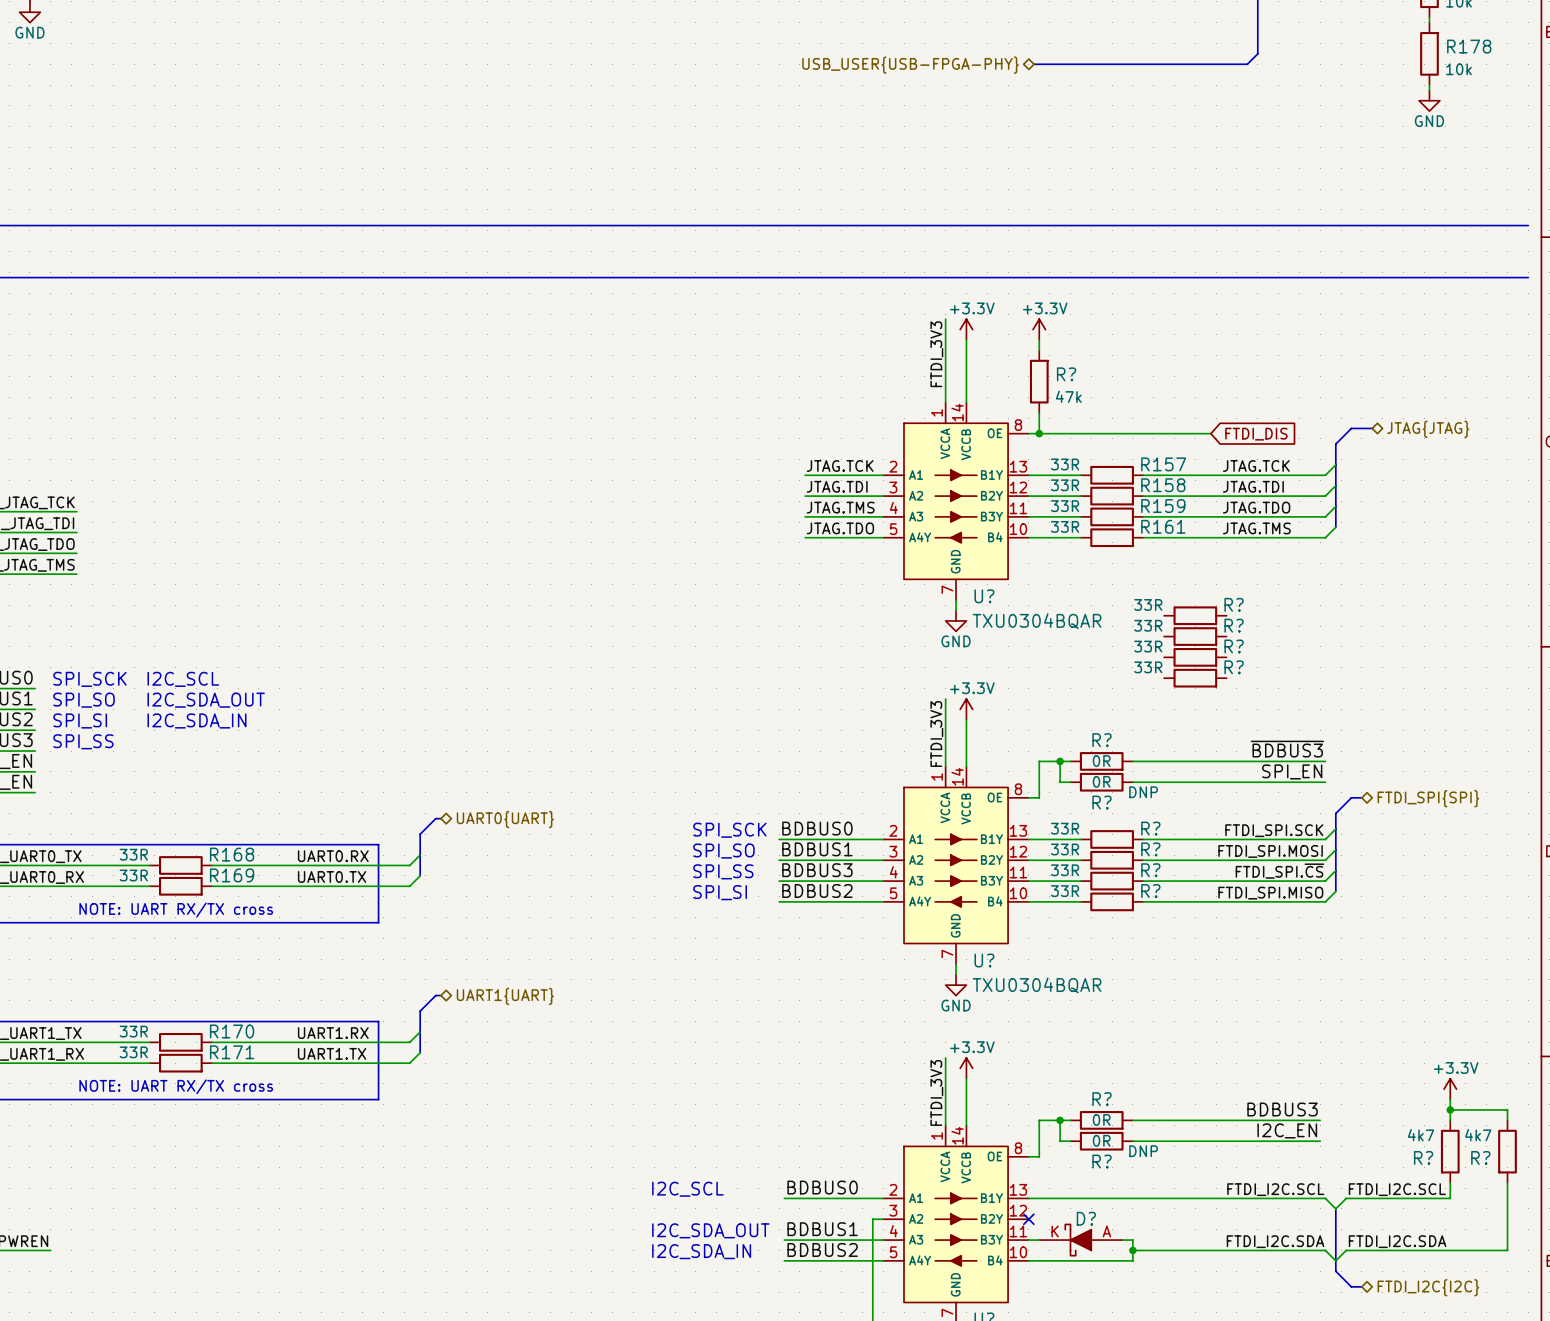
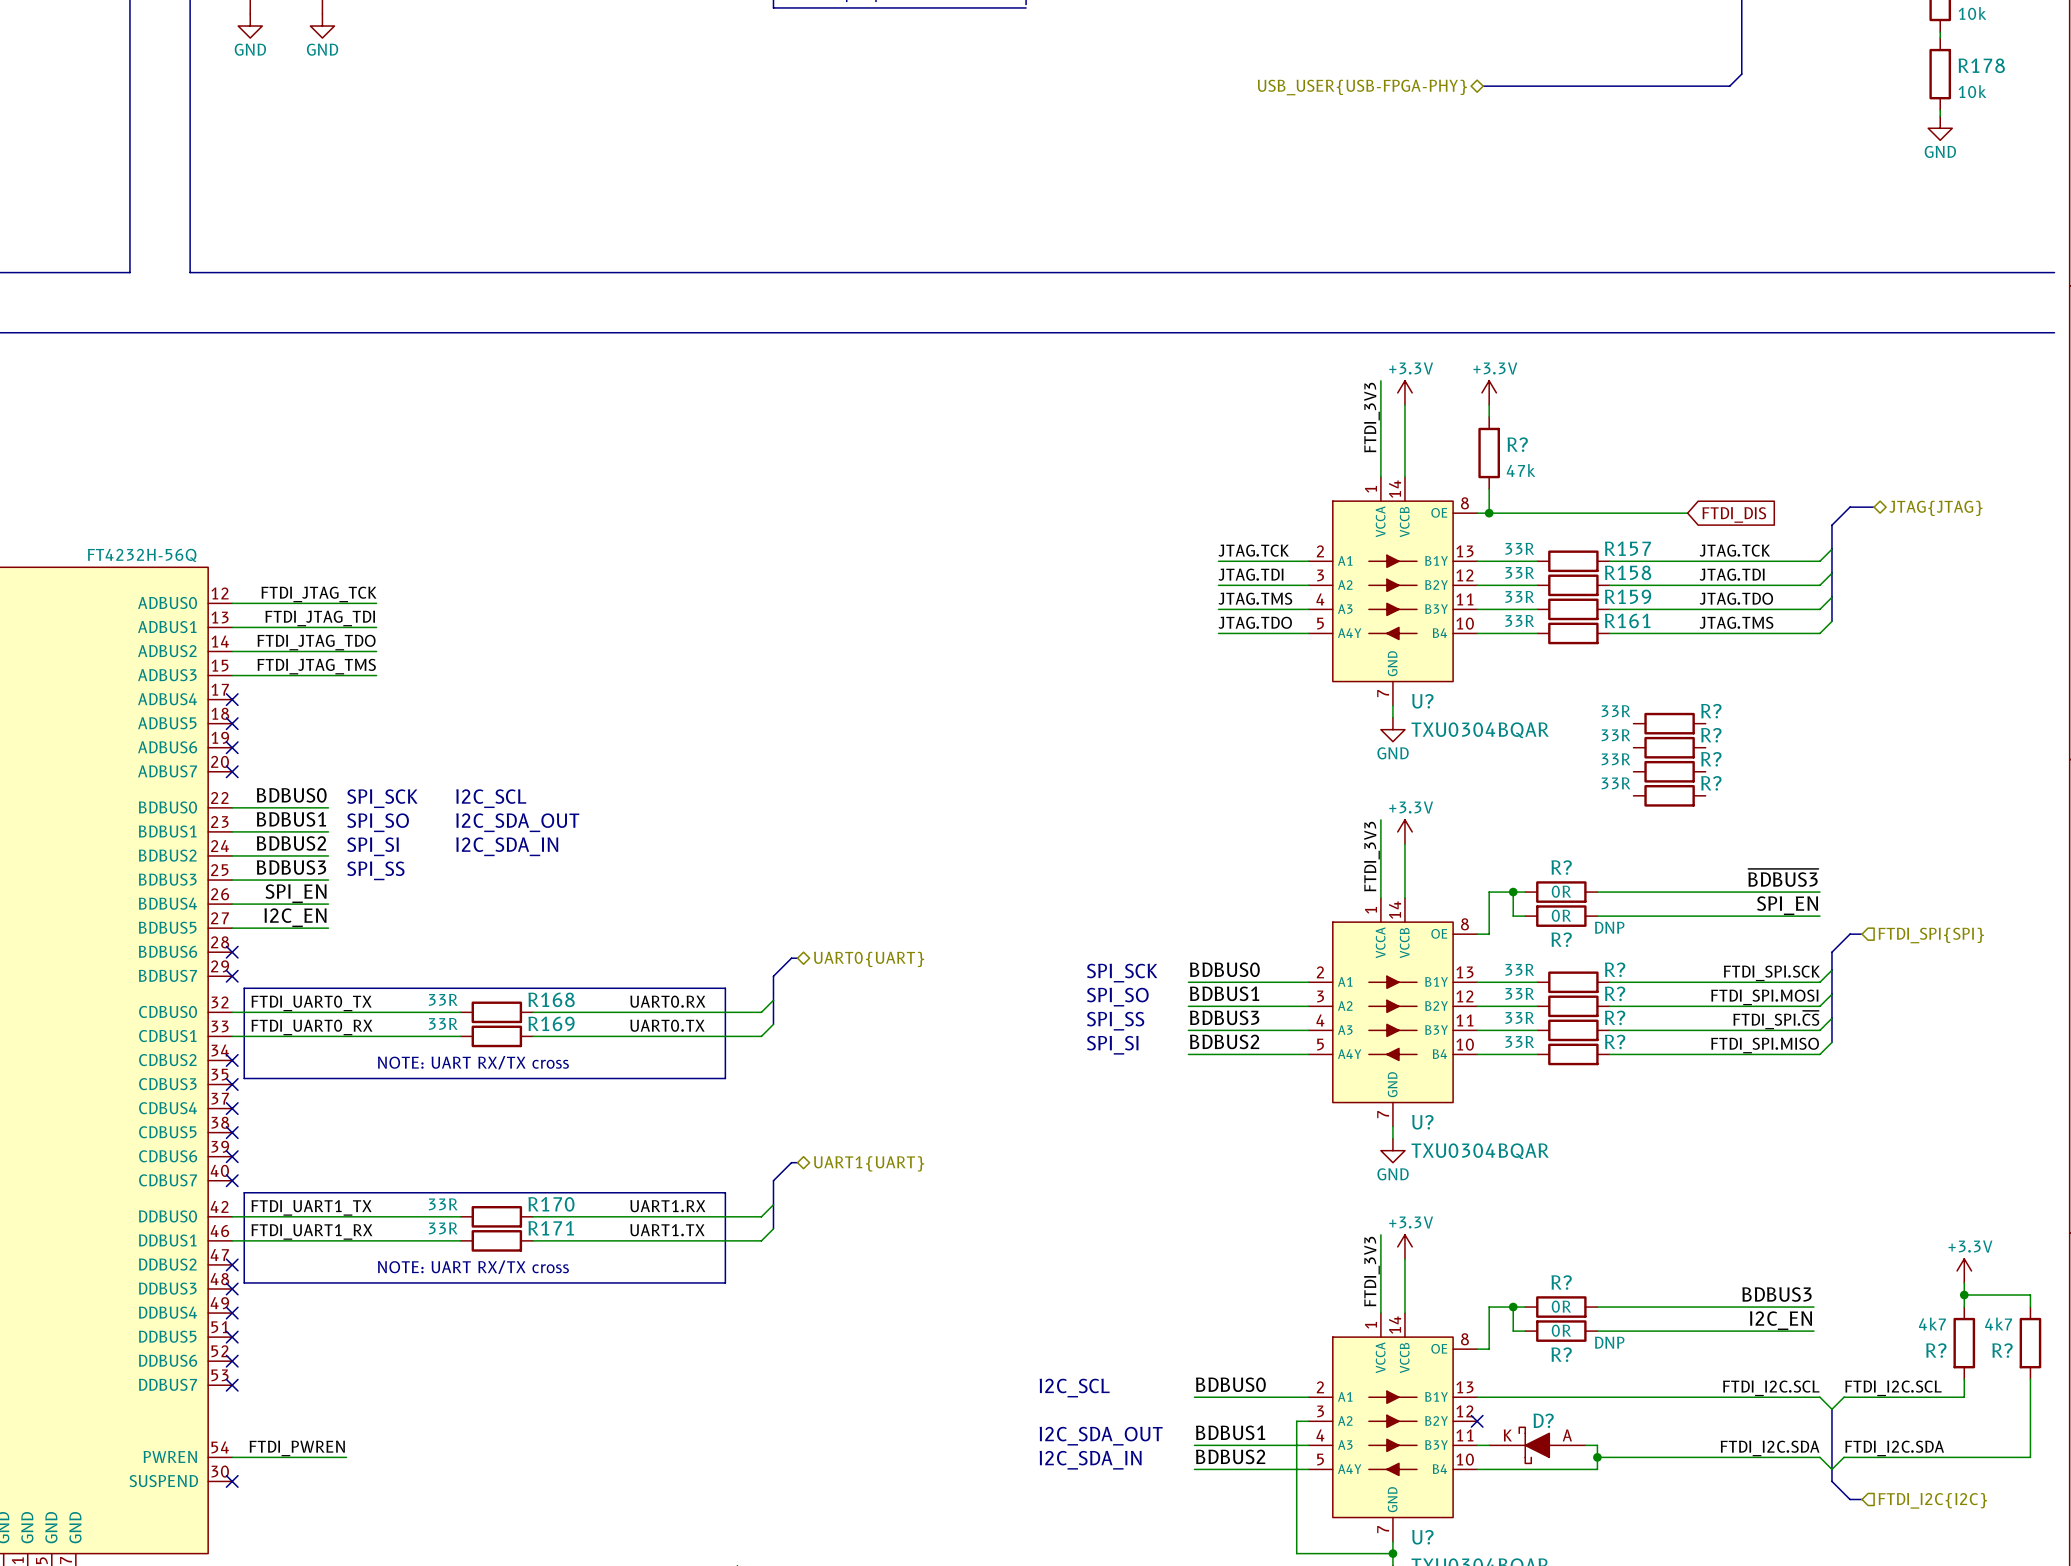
hierarchical label shape: bidirectional (1428, 798) -> input (1931, 935)
hierarchical label shape: bidirectional (1428, 1287) -> input (1932, 1500)

